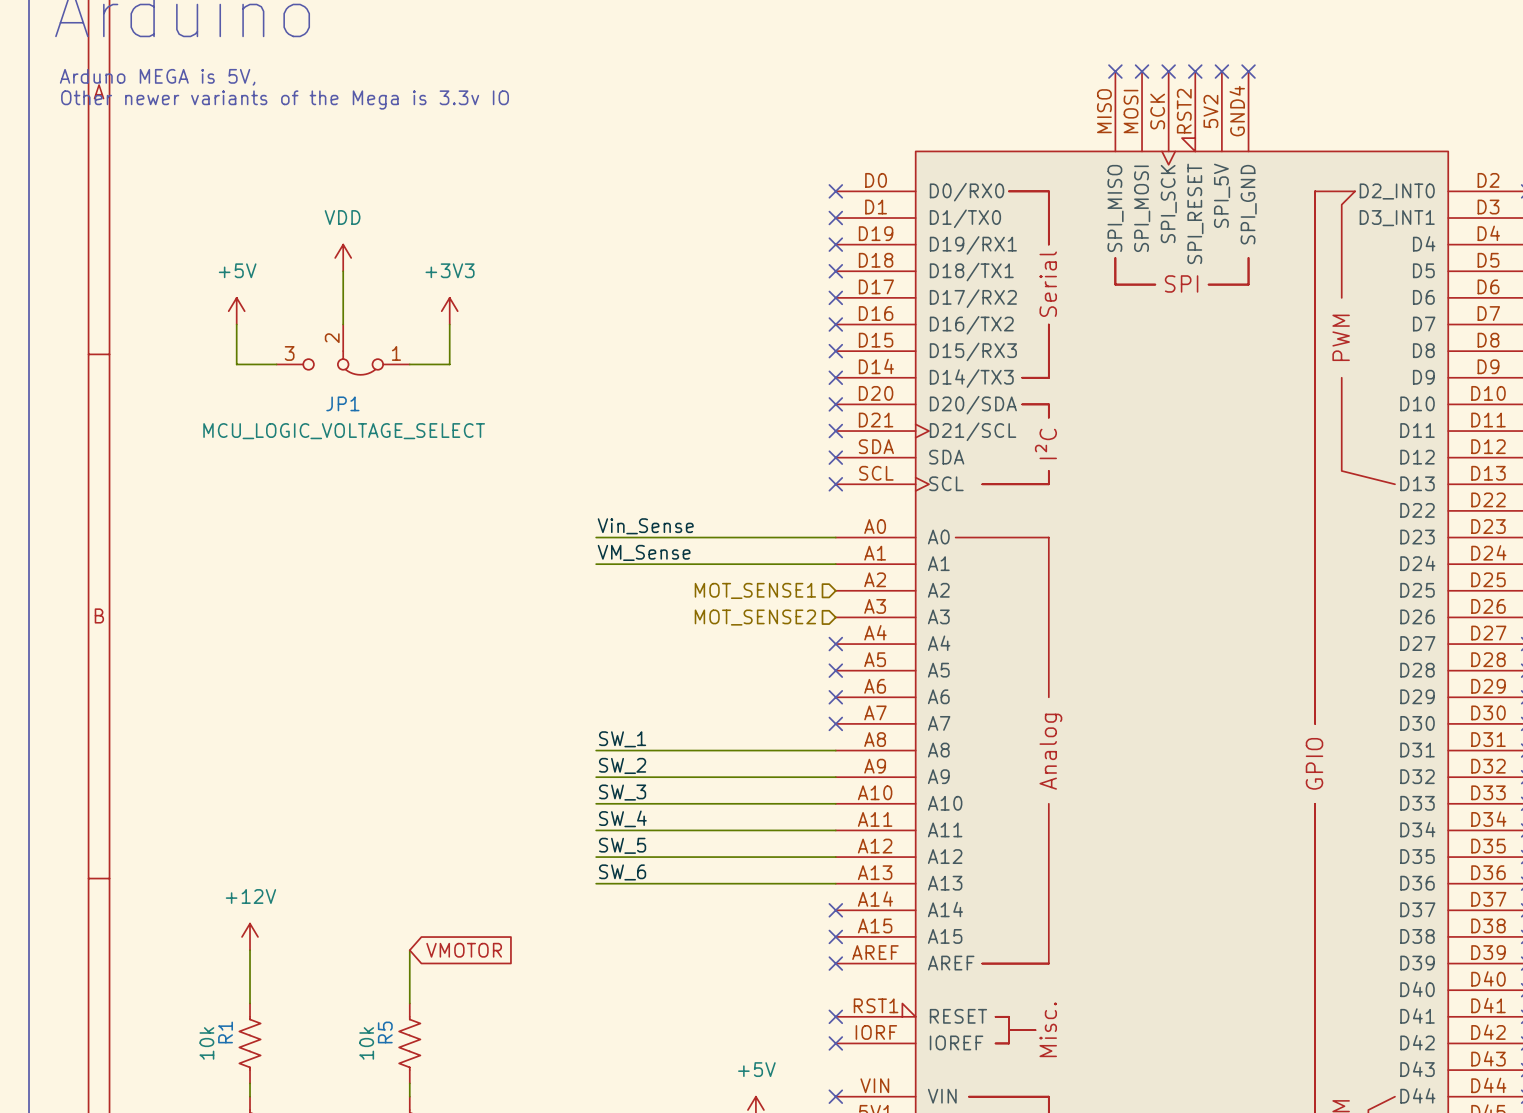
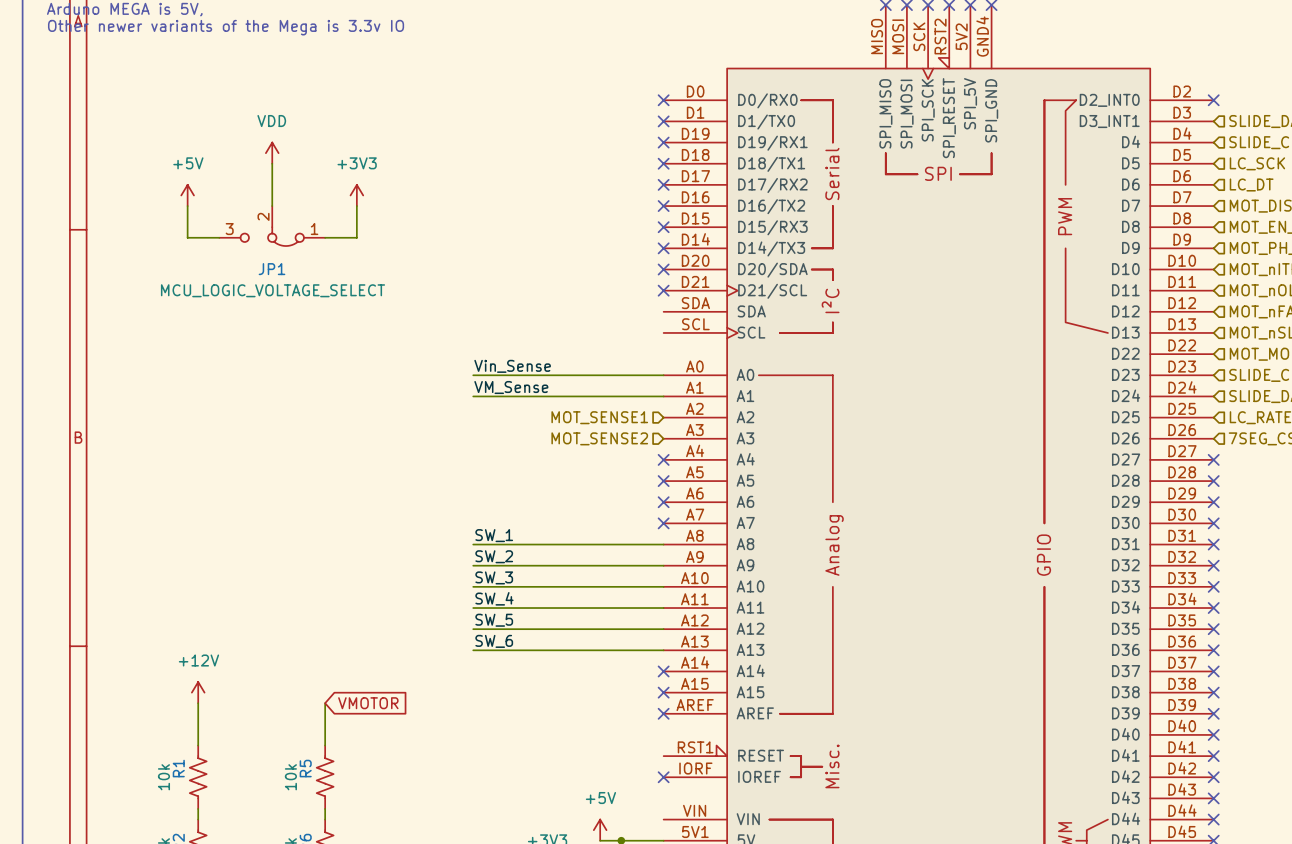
no-connect mark: (835, 457) -> none
no-connect mark: (835, 484) -> none
no-connect mark: (835, 1016) -> none
no-connect mark: (835, 1096) -> none

